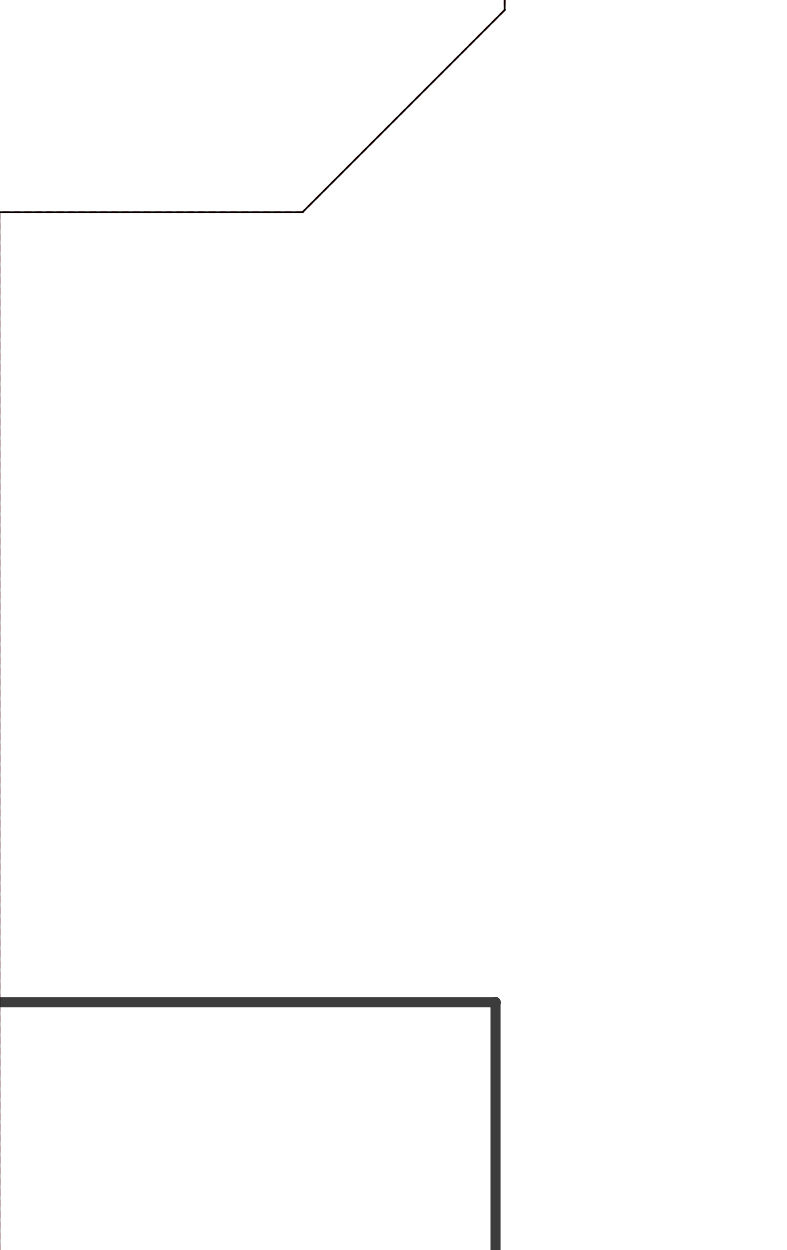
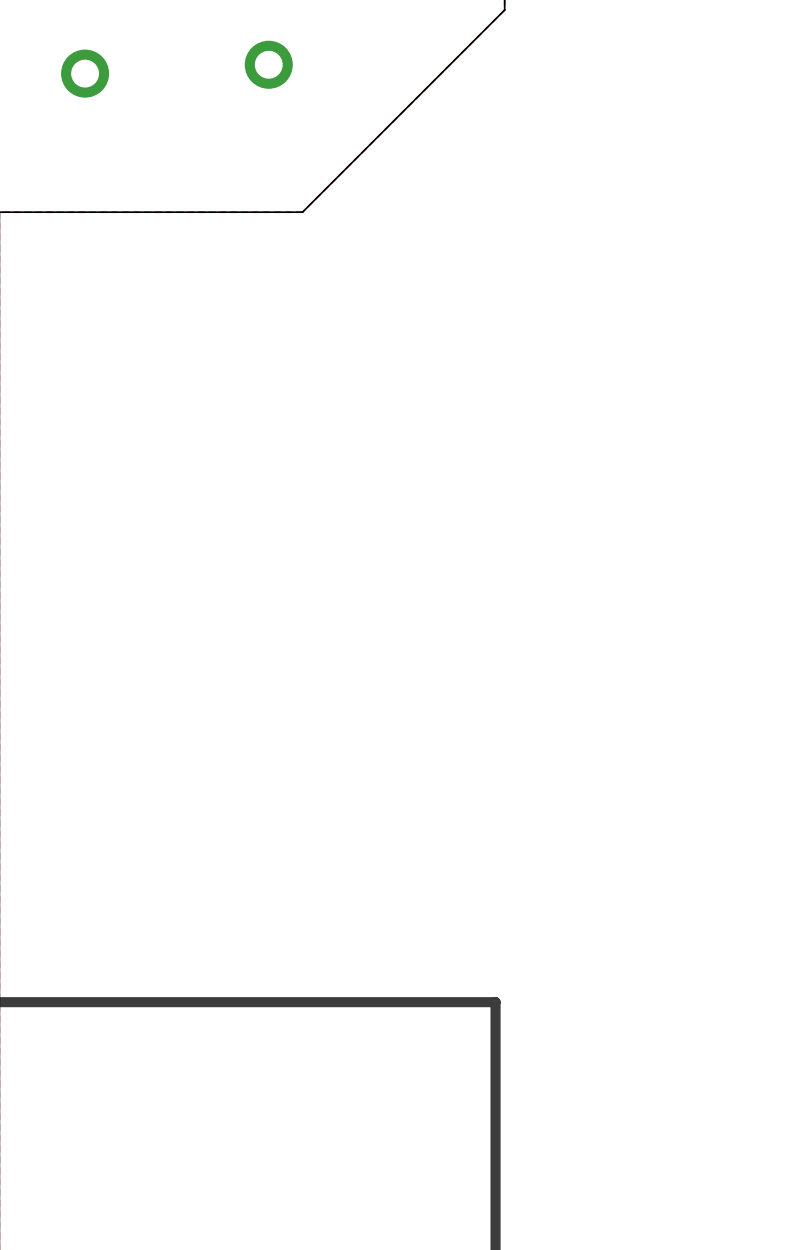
via: none -> (268, 64)
via: none -> (85, 73)

